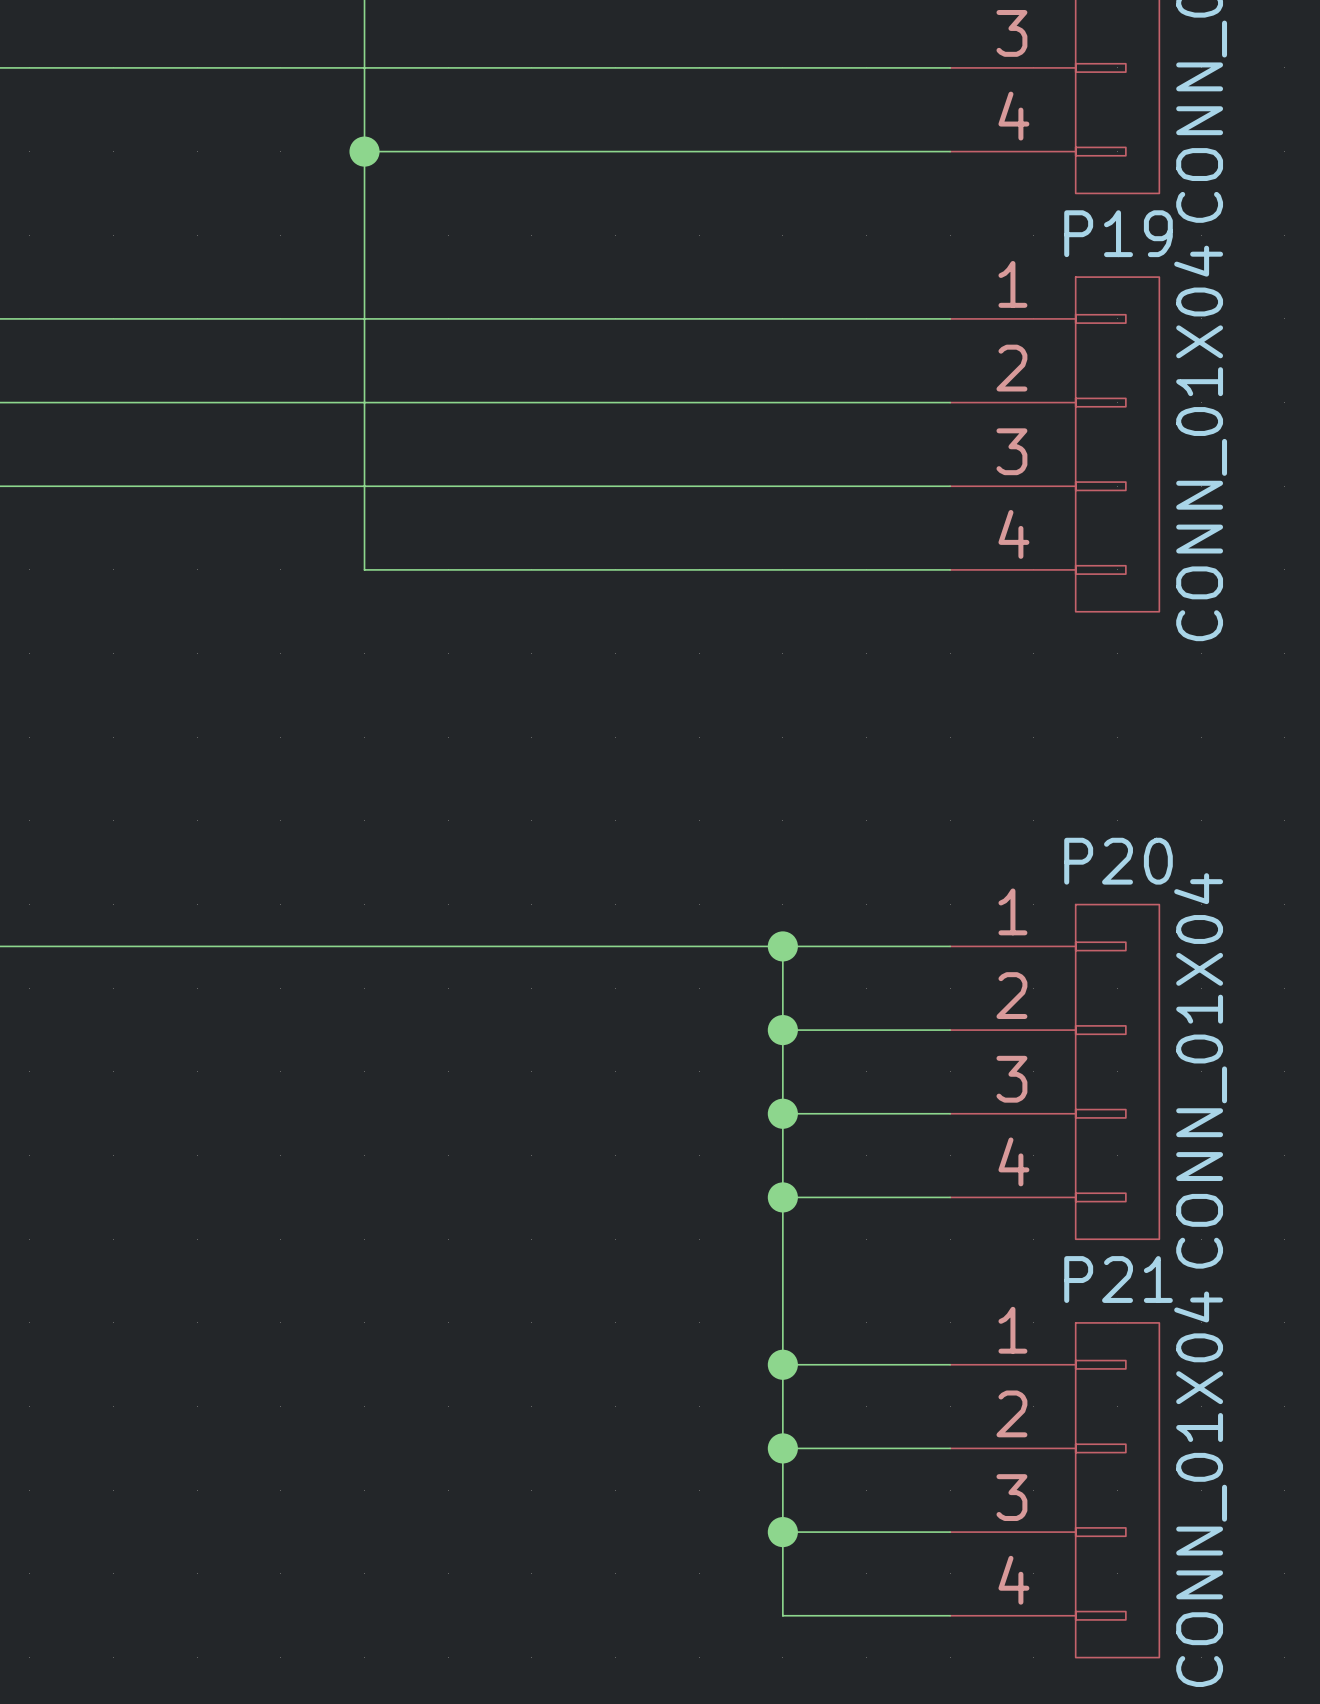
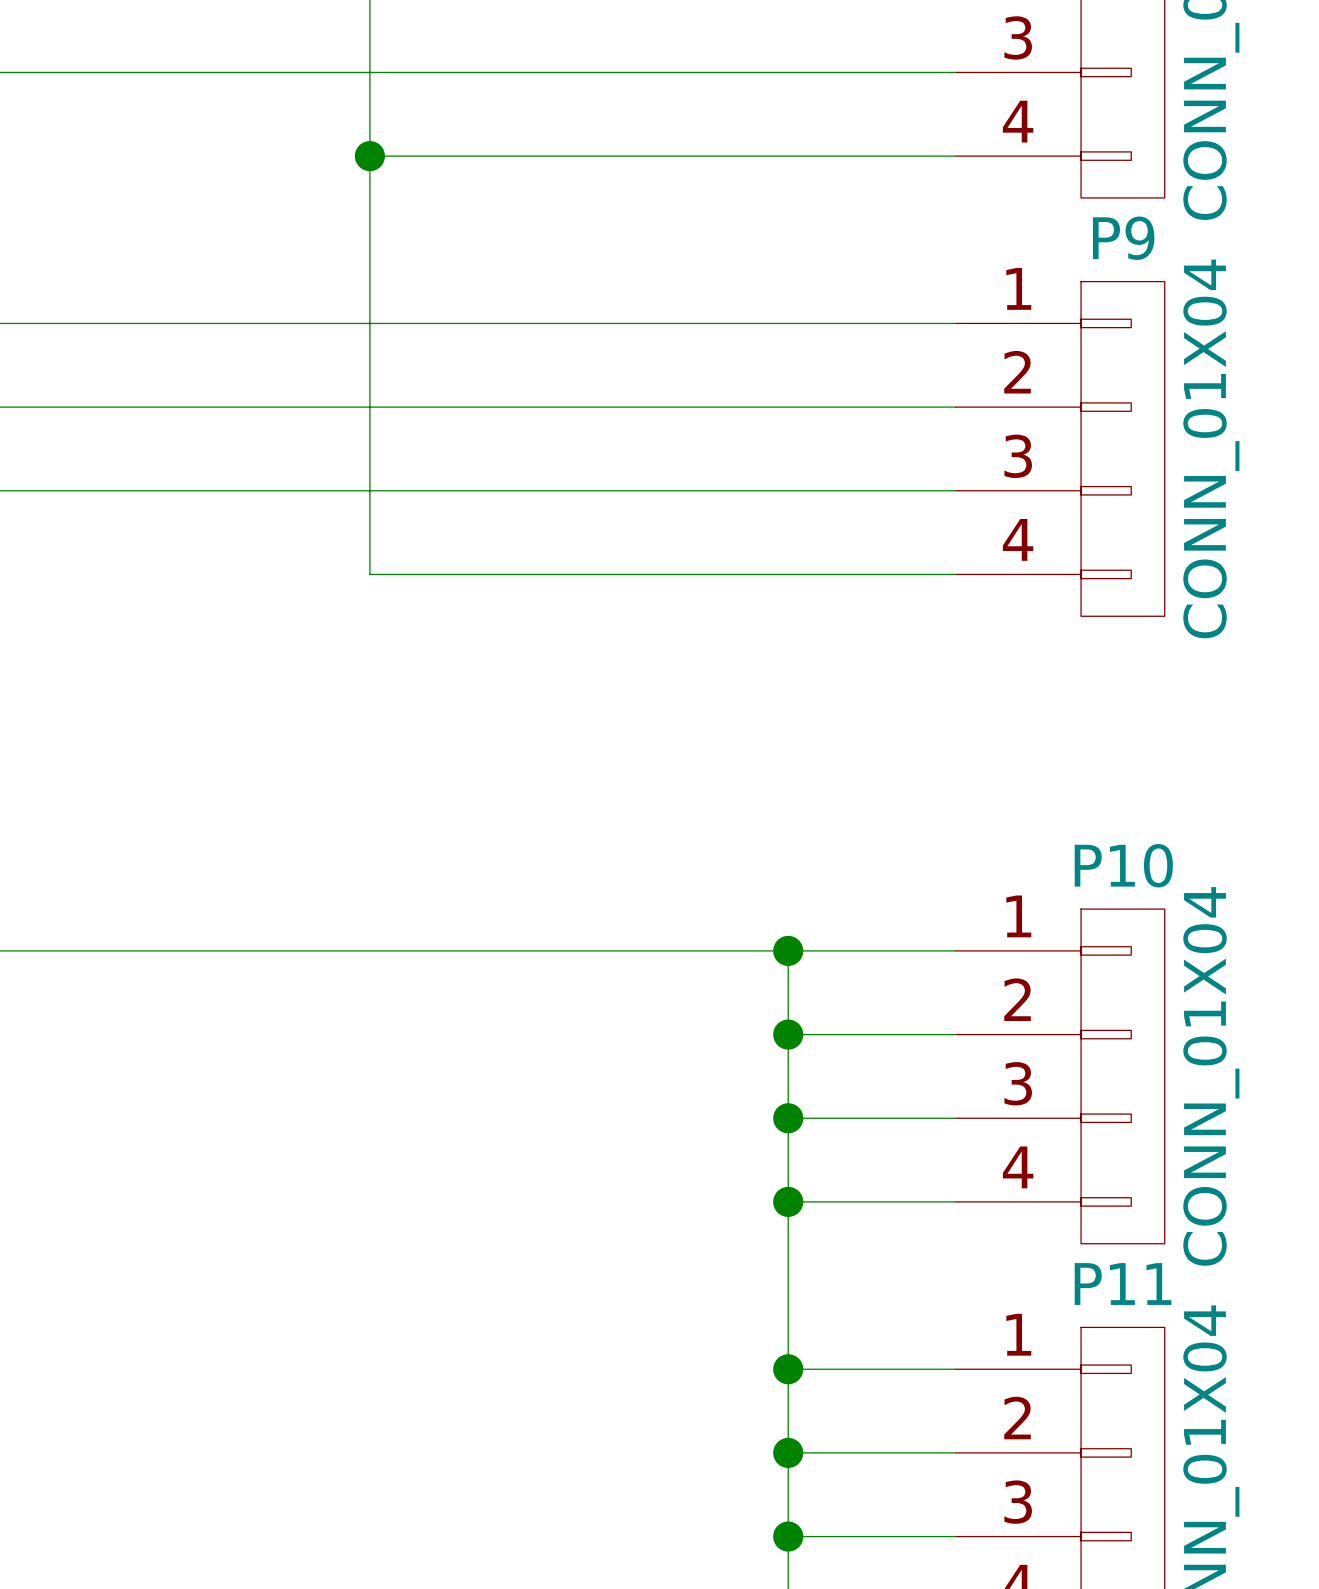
P19 name: P19 (1118, 233) -> P9 (1123, 238)
P20 name: P20 (1118, 861) -> P10 (1123, 865)
P21 name: P21 (1118, 1279) -> P11 (1123, 1284)

